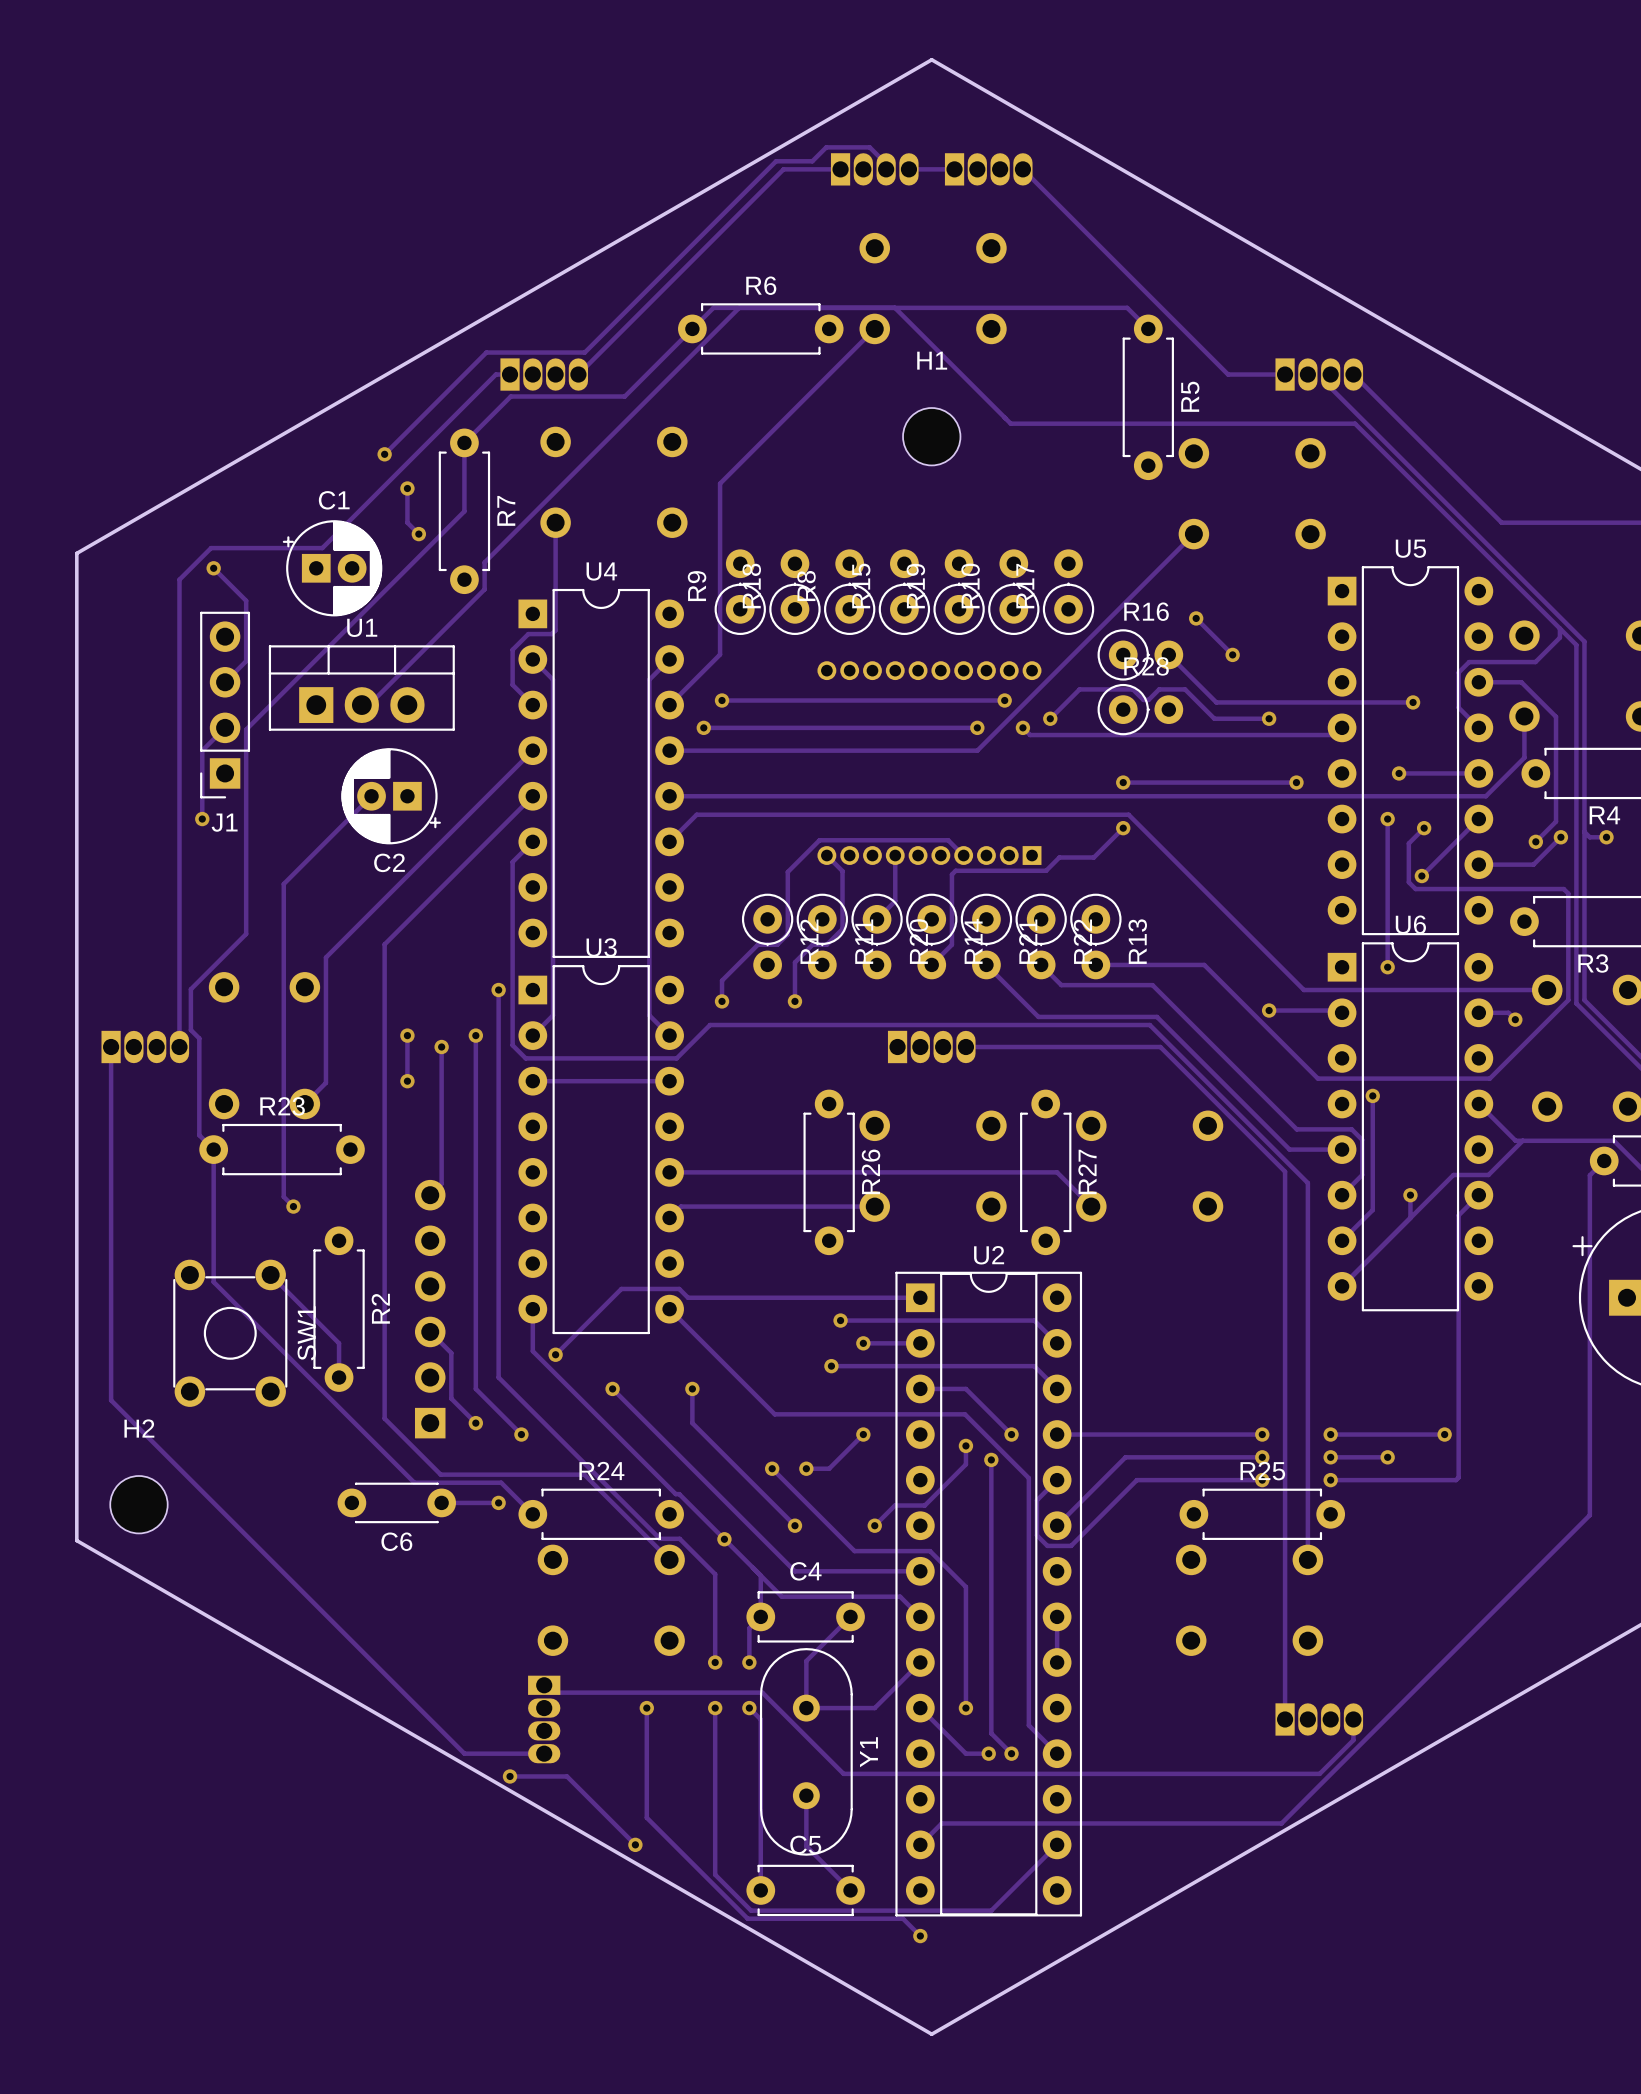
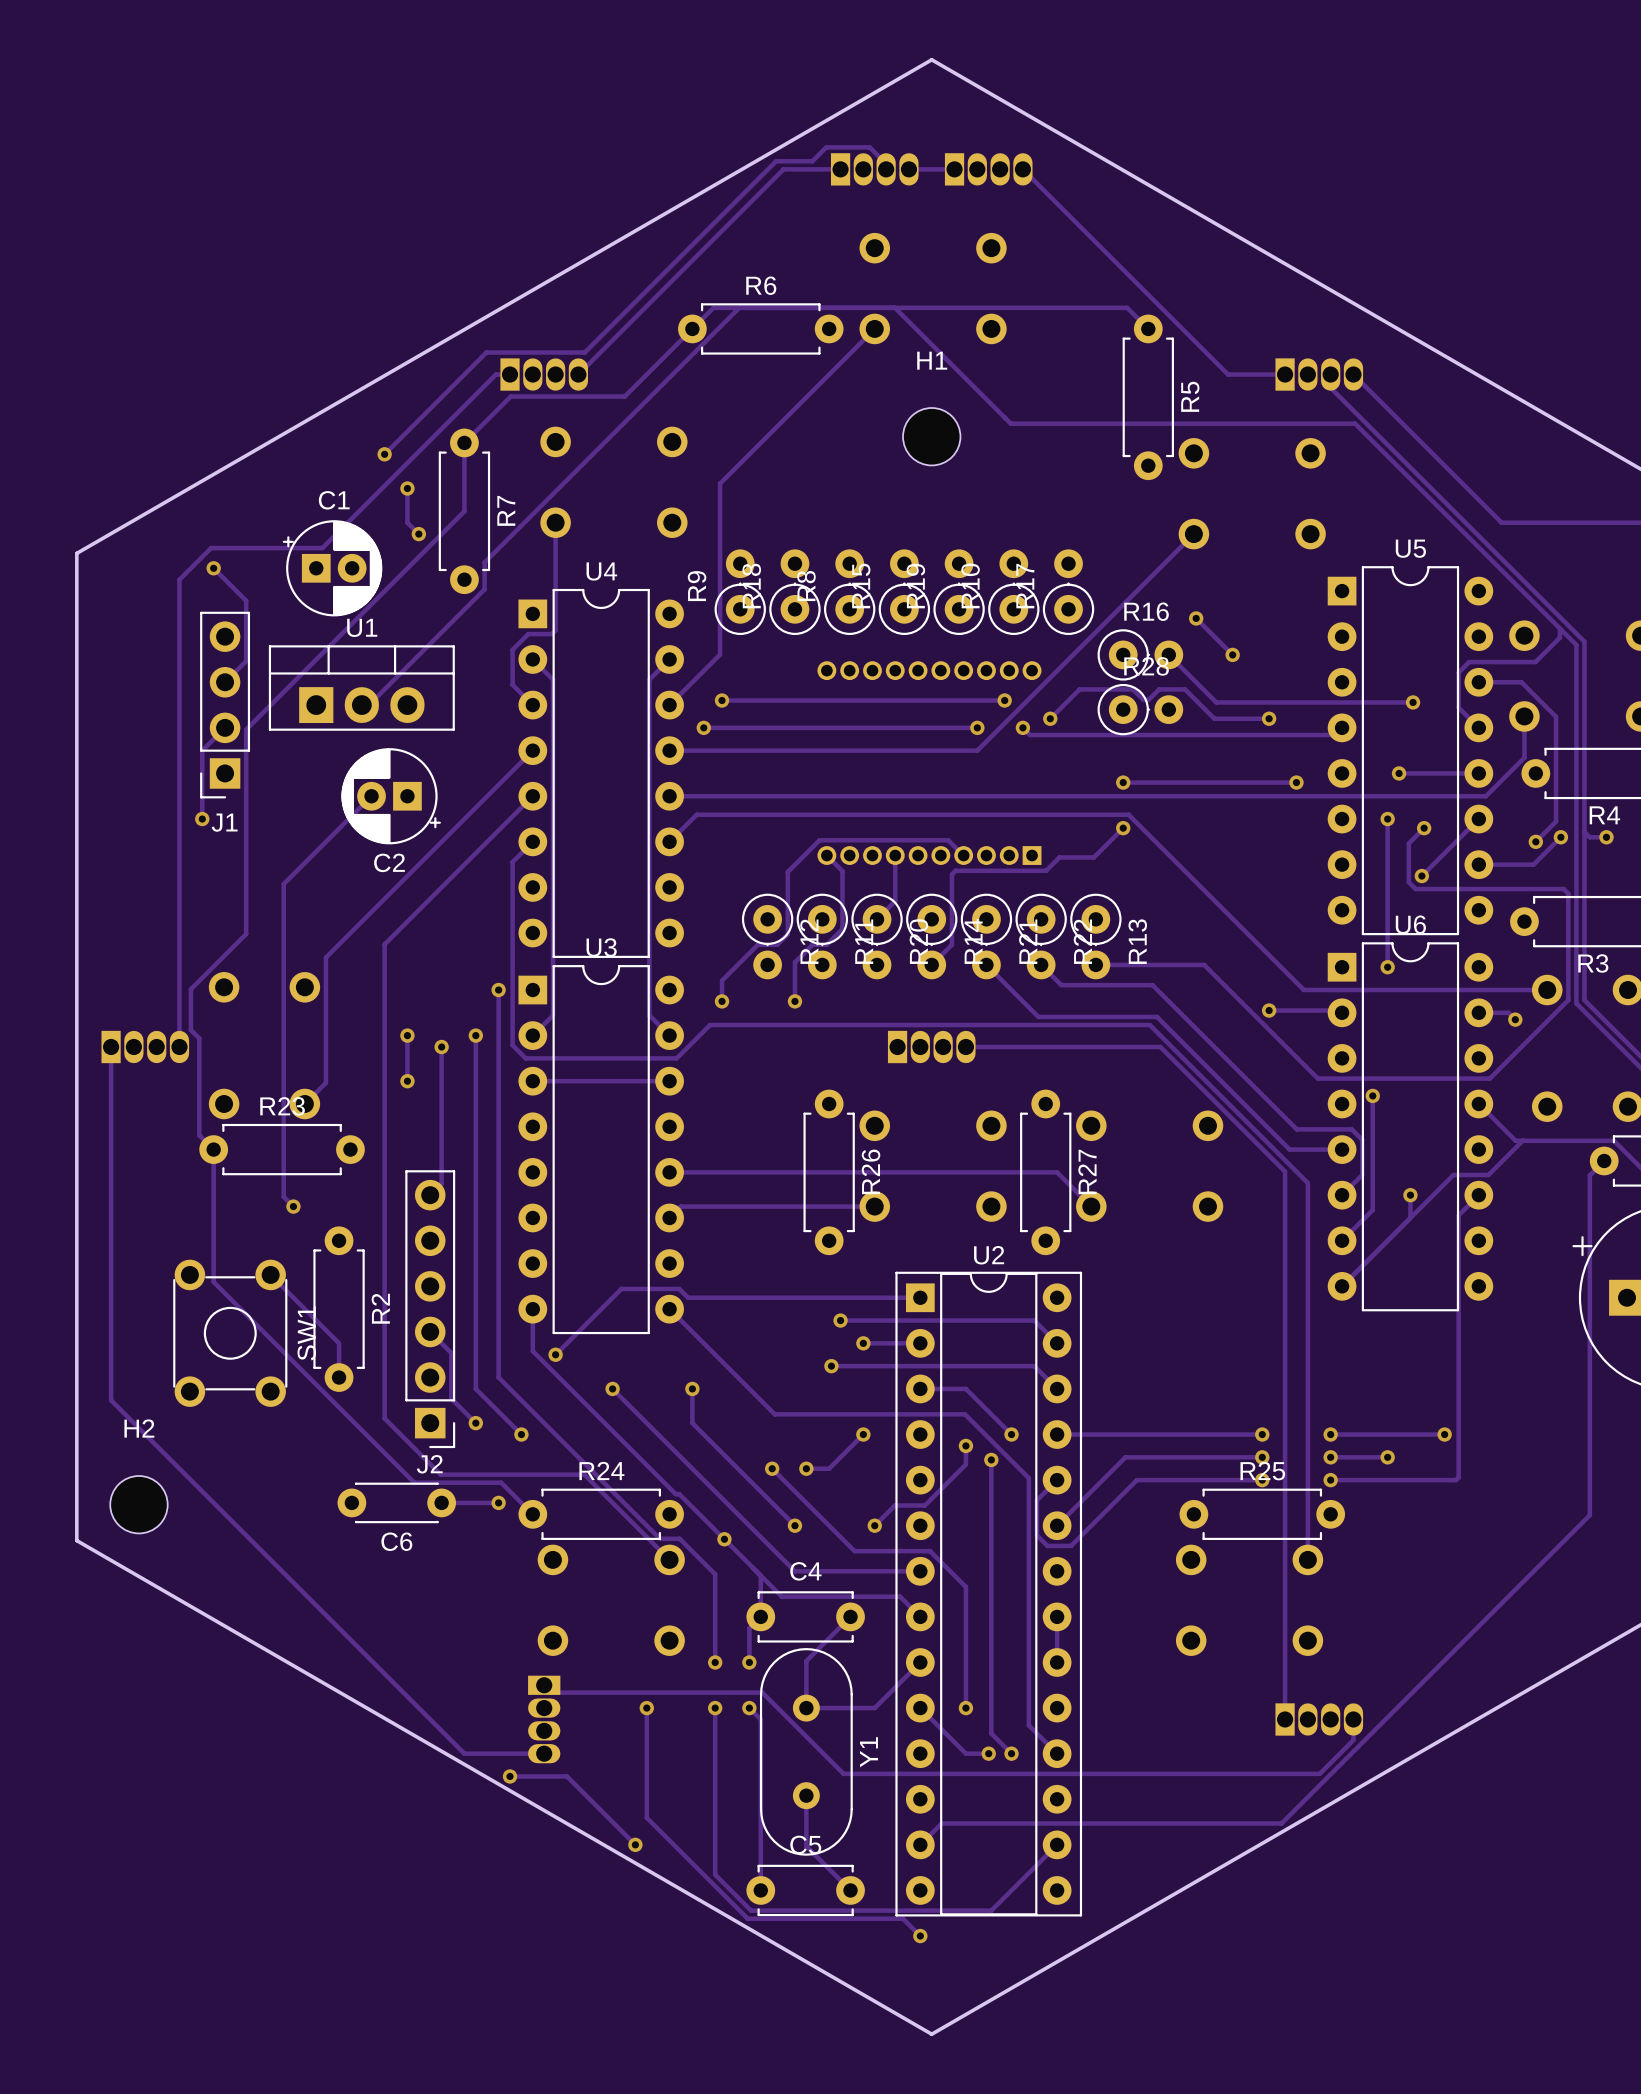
J2 side: bottom (430, 1309) -> top (430, 1309)

